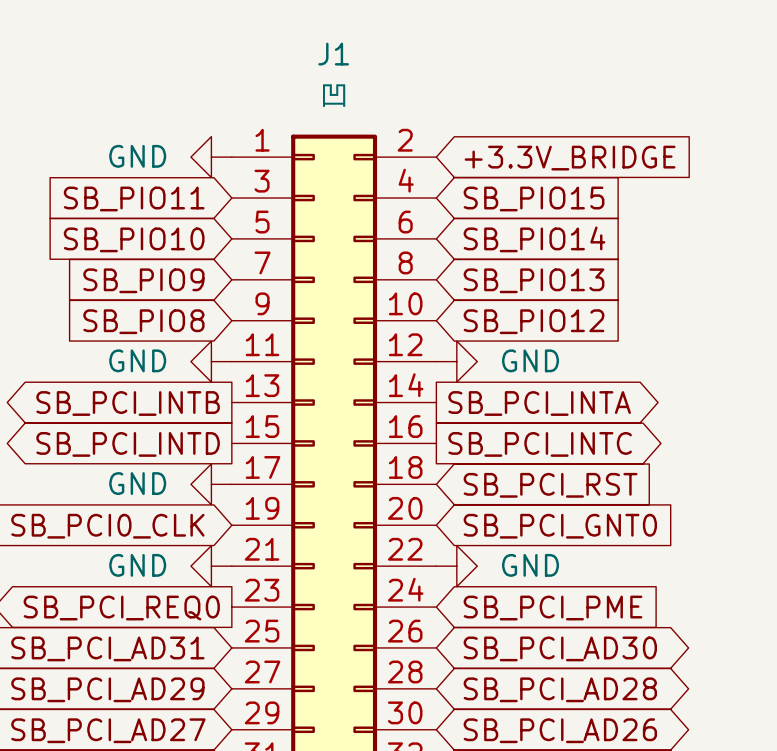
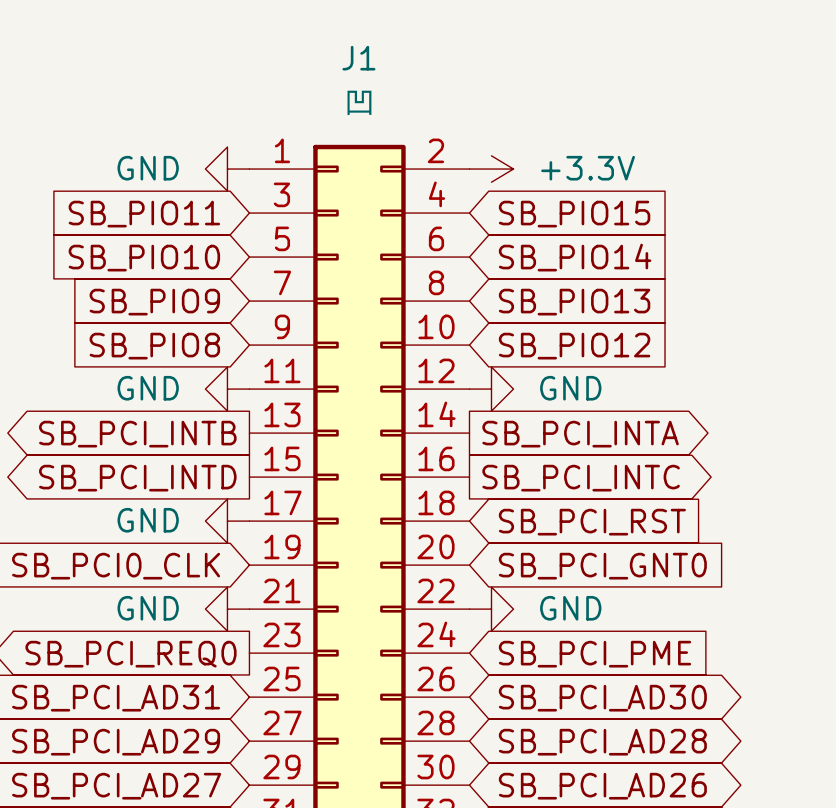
power symbol: none -> +3.3V (491, 169)
global label: +3.3V_BRIDGE (570, 158) -> none

